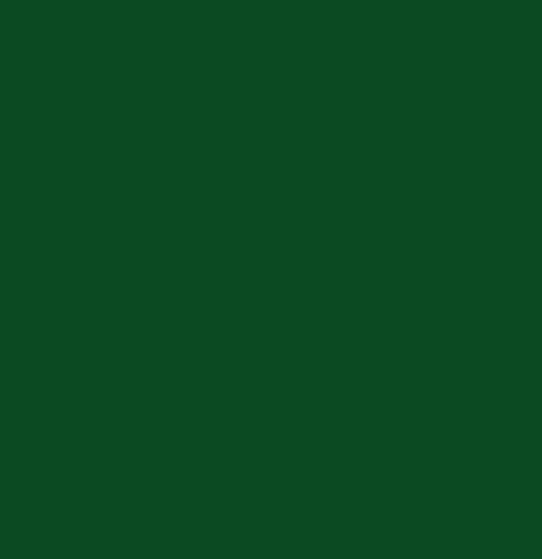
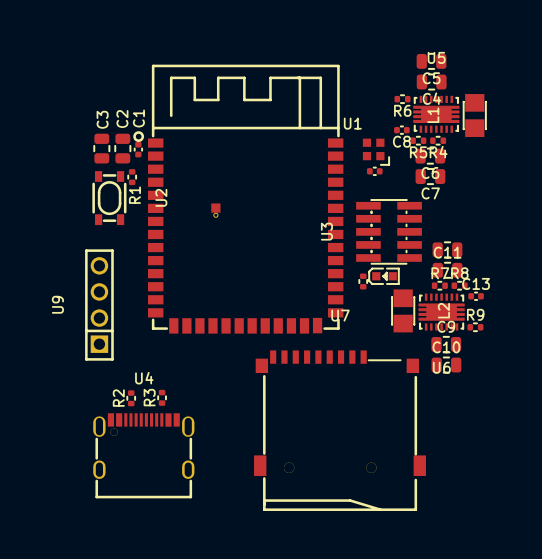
C5: none -> (431, 61)
C4: none -> (431, 81)
R6: none -> (402, 99)
U5: none -> (436, 115)
L1: none -> (474, 115)
C8: none -> (401, 130)
R5: none -> (418, 140)
R4: none -> (438, 140)
C3: none -> (101, 148)
C2: none -> (122, 148)
C1: none -> (138, 149)
part: none -> (376, 152)
C6: none -> (430, 156)
part: none -> (374, 171)
C7: none -> (430, 176)
R1: none -> (132, 177)
U2: none -> (109, 198)
U1: none -> (238, 199)
U3: none -> (389, 231)
part: none -> (447, 249)
C11: none -> (447, 270)
part: none -> (384, 276)
part: none -> (363, 281)
R7: none -> (439, 285)
R8: none -> (459, 285)
C13: none -> (476, 296)
U9: none -> (99, 305)
L2: none -> (403, 310)
U6: none -> (441, 310)
R9: none -> (475, 327)
C9: none -> (446, 344)
C10: none -> (446, 365)
R3: none -> (162, 397)
R2: none -> (131, 398)
U7: none -> (340, 430)
U4: none -> (143, 455)

